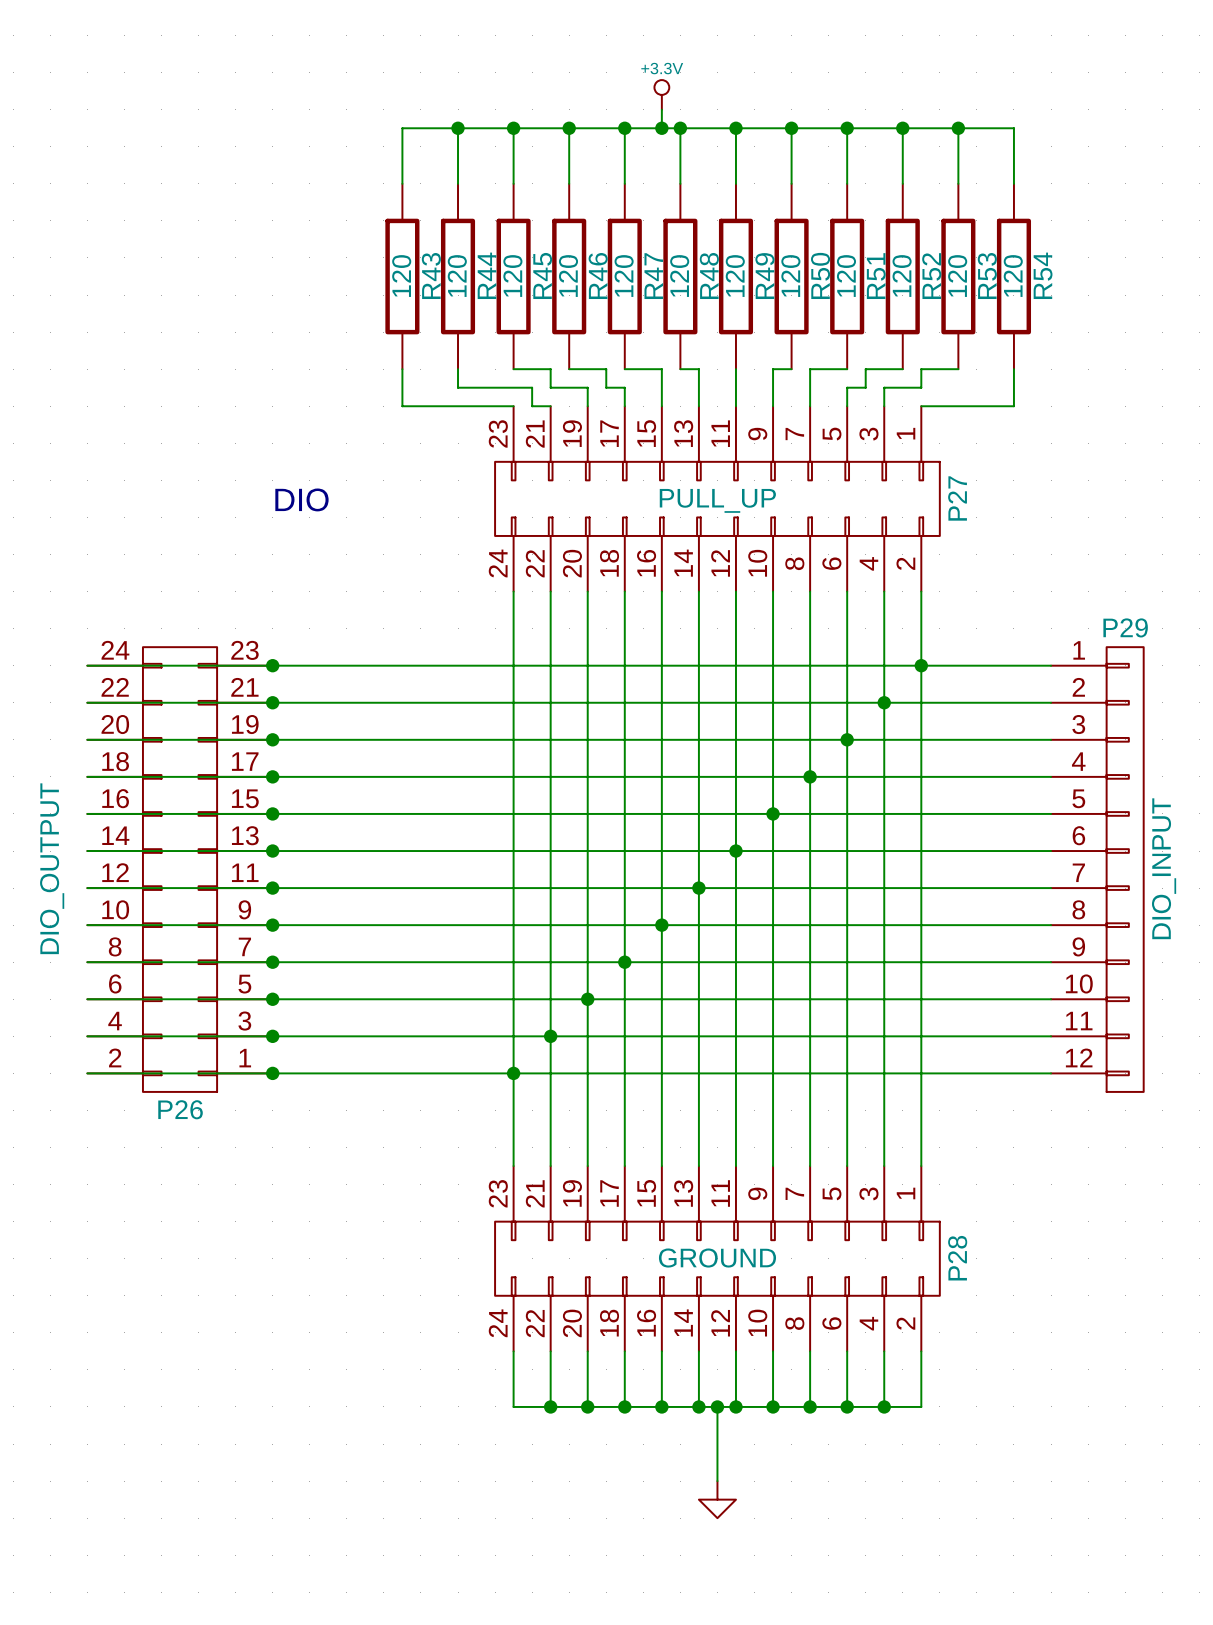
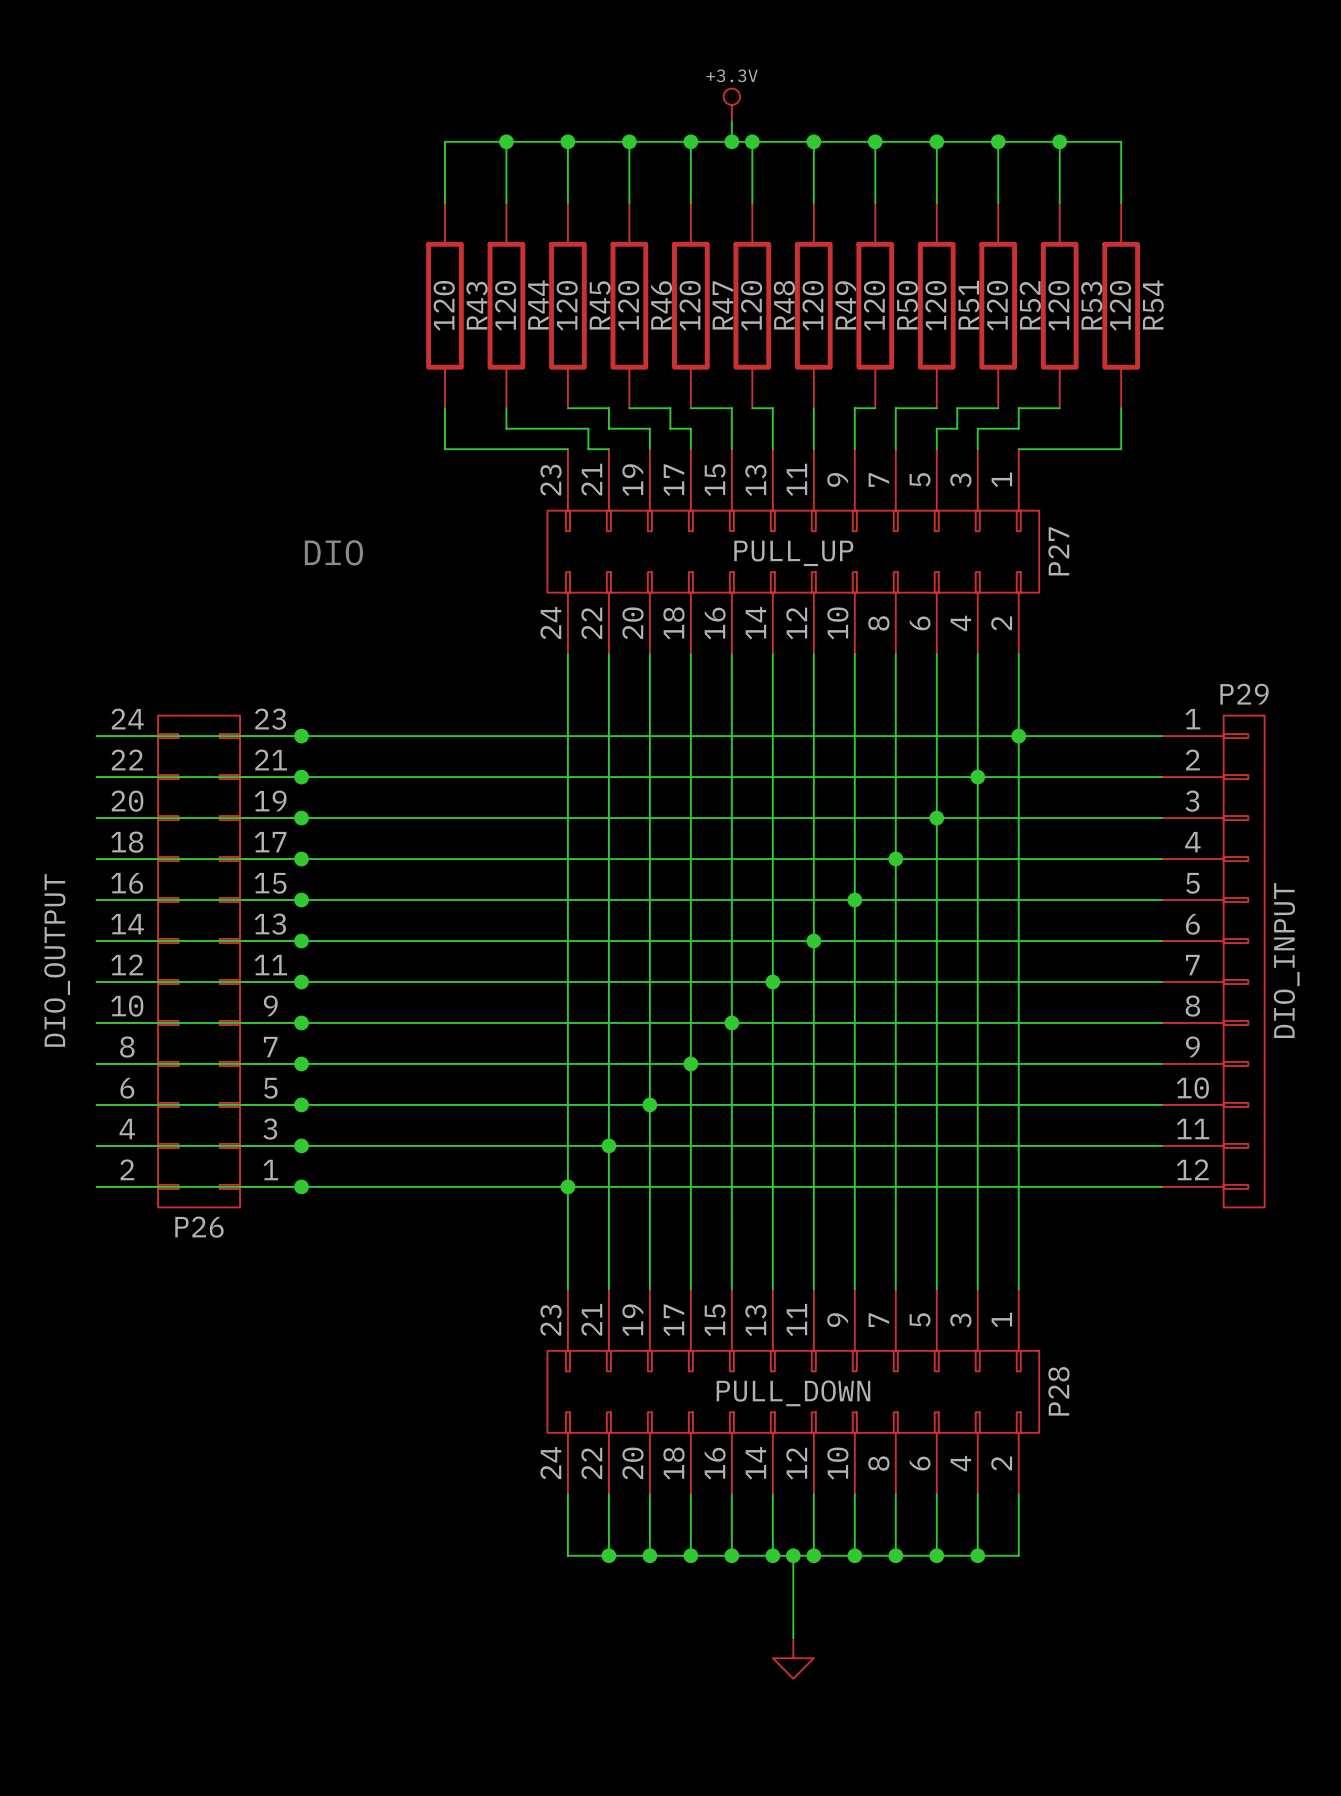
P28 value: GROUND (717, 1258) -> PULL_DOWN (793, 1393)

